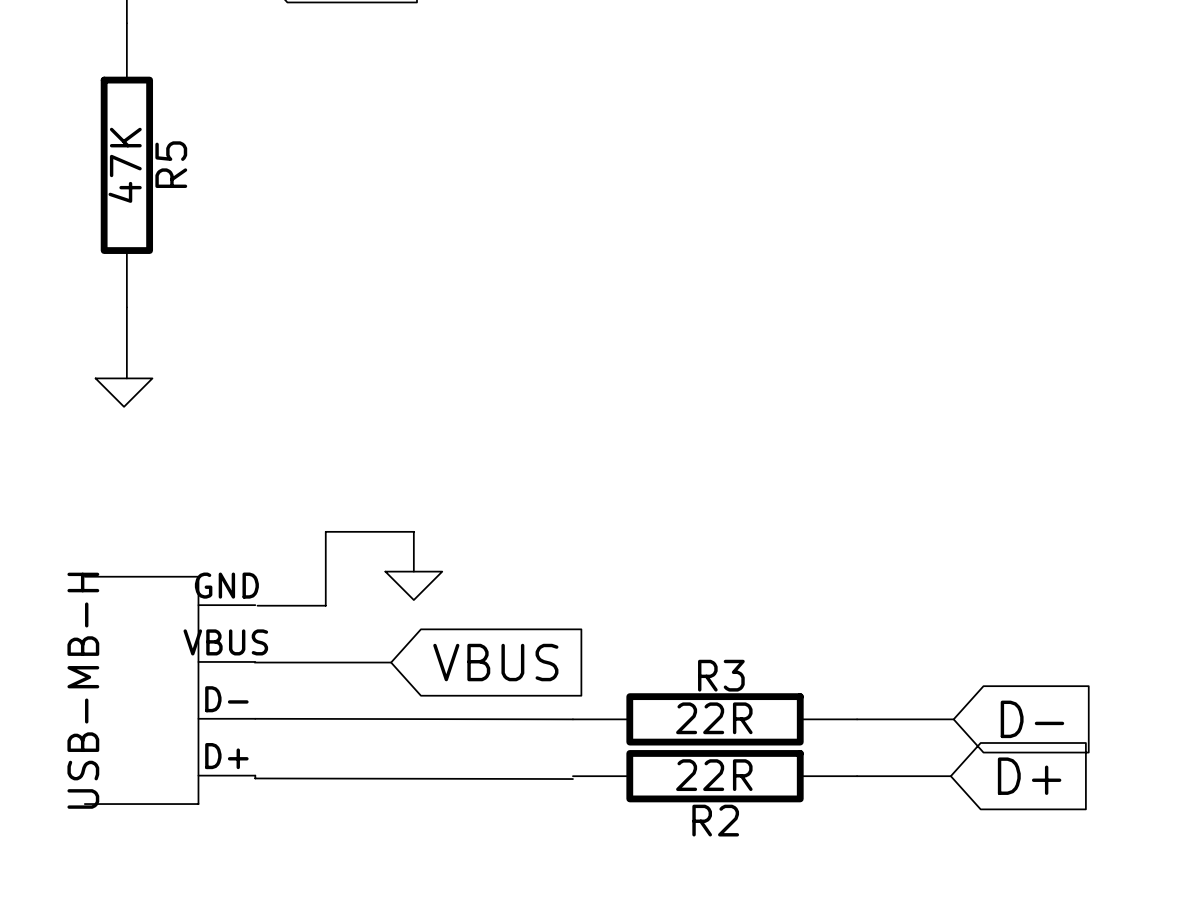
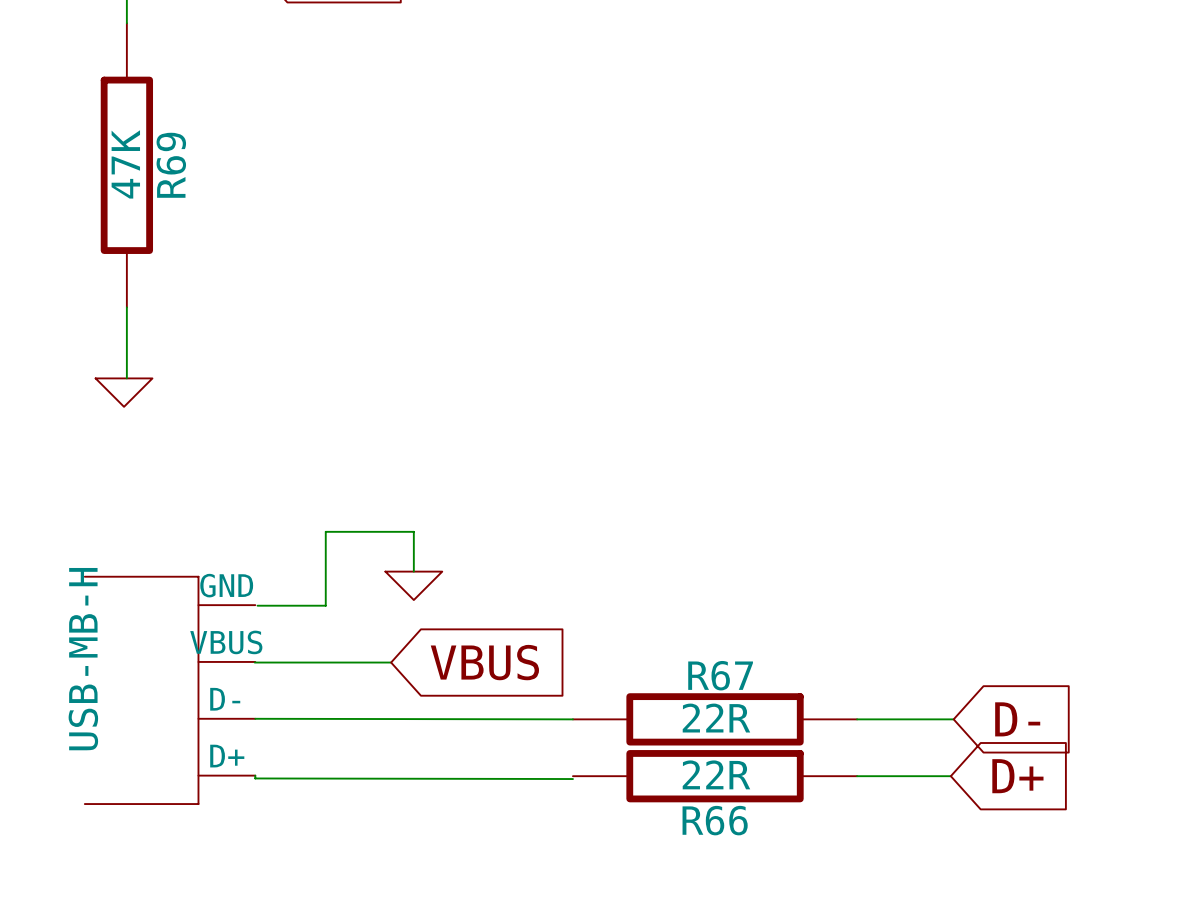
R5 name: R5 (171, 164) -> R69 (171, 165)
R3 name: R3 (721, 675) -> R67 (720, 675)
R2 name: R2 (715, 820) -> R66 (715, 820)

